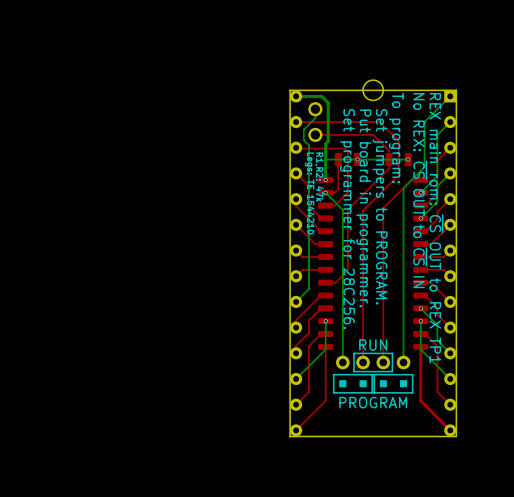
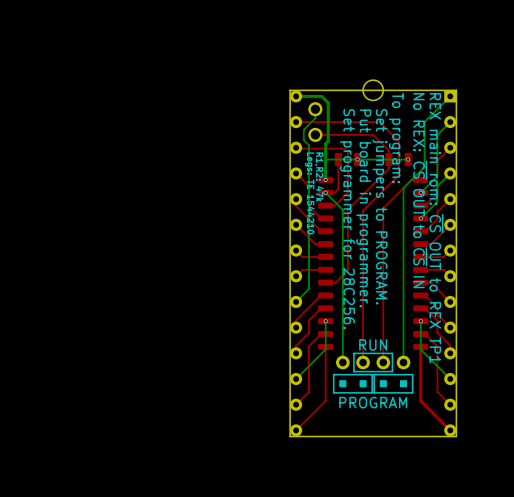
top track: none -> (420, 308) (425, 308) (437, 320) (437, 332) (450, 345) (450, 353)
bottom track: (420, 308) (437, 325) (437, 340) (450, 353) -> none
via: (420, 308) -> none

